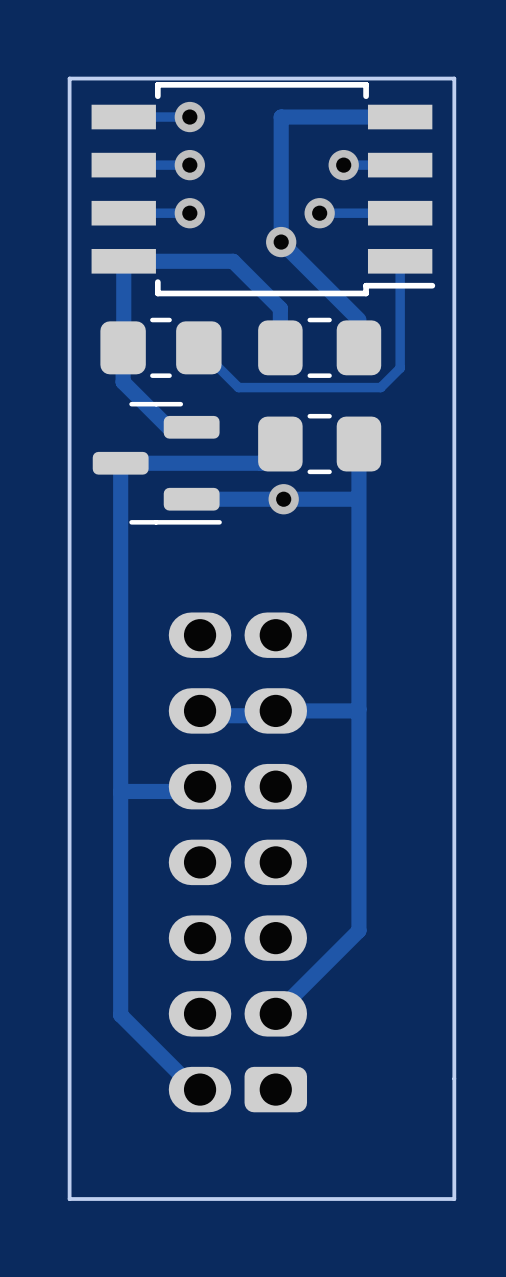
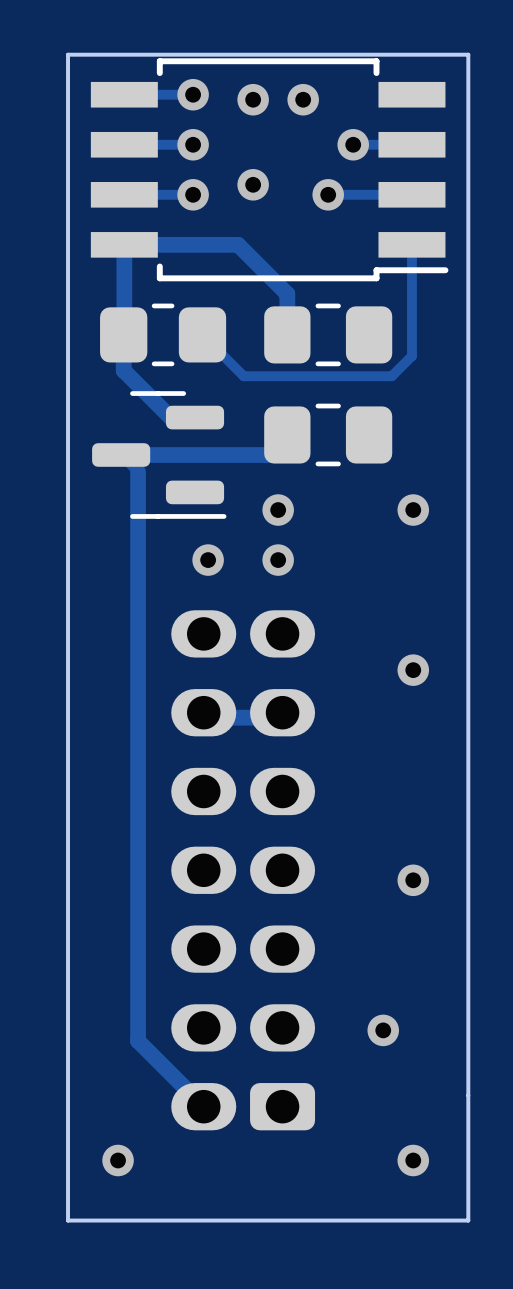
track: (400, 117) (281, 117) (281, 242) (358, 319) (358, 347) -> none
via: none -> (253, 99)
via: none -> (303, 99)
via position: (281, 242) -> (253, 184)
track: (358, 444) (358, 930) (275, 1013) -> none
track: (120, 463) (120, 1015) (200, 1094) -> (121, 454) (138, 471) (138, 1041) (203, 1106)
track: (191, 499) (352, 499) -> none
via position: (283, 499) -> (278, 510)
via: none -> (413, 510)
via: none -> (208, 560)
via: none -> (278, 560)
via: none -> (413, 670)
track: (358, 709) (357, 710) (275, 710) -> none
track: (200, 791) (120, 792) -> none
via: none -> (413, 880)
via: none -> (383, 1030)
via: none -> (118, 1160)
via: none -> (413, 1160)

